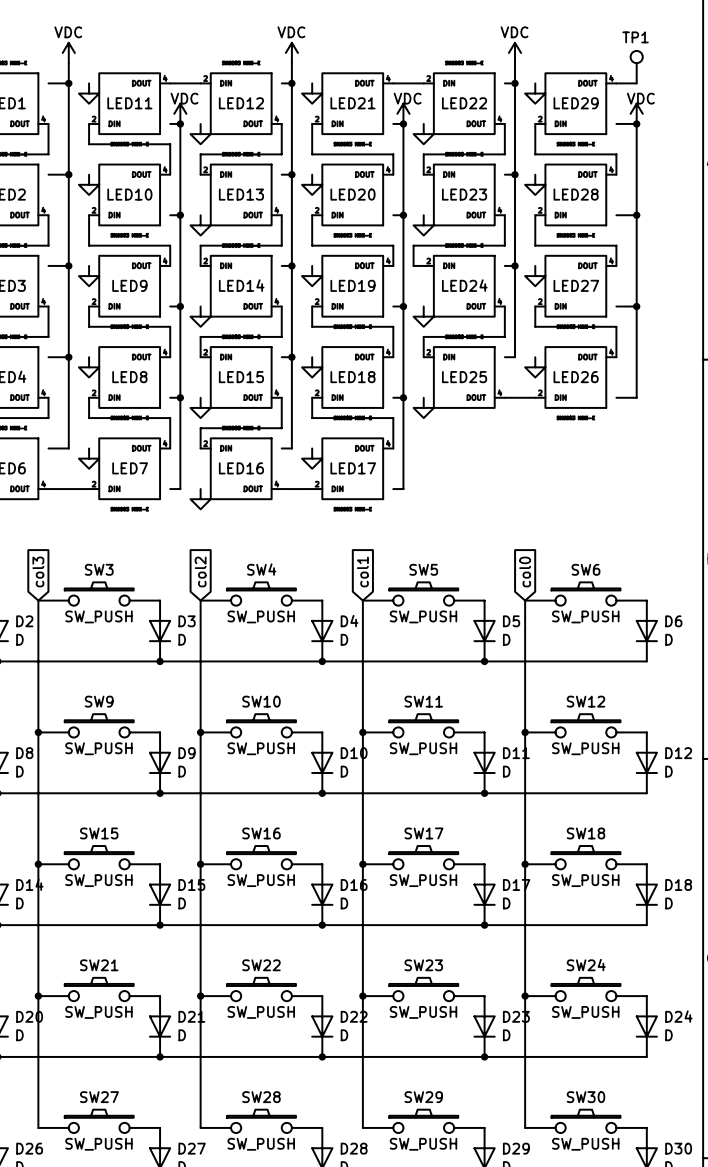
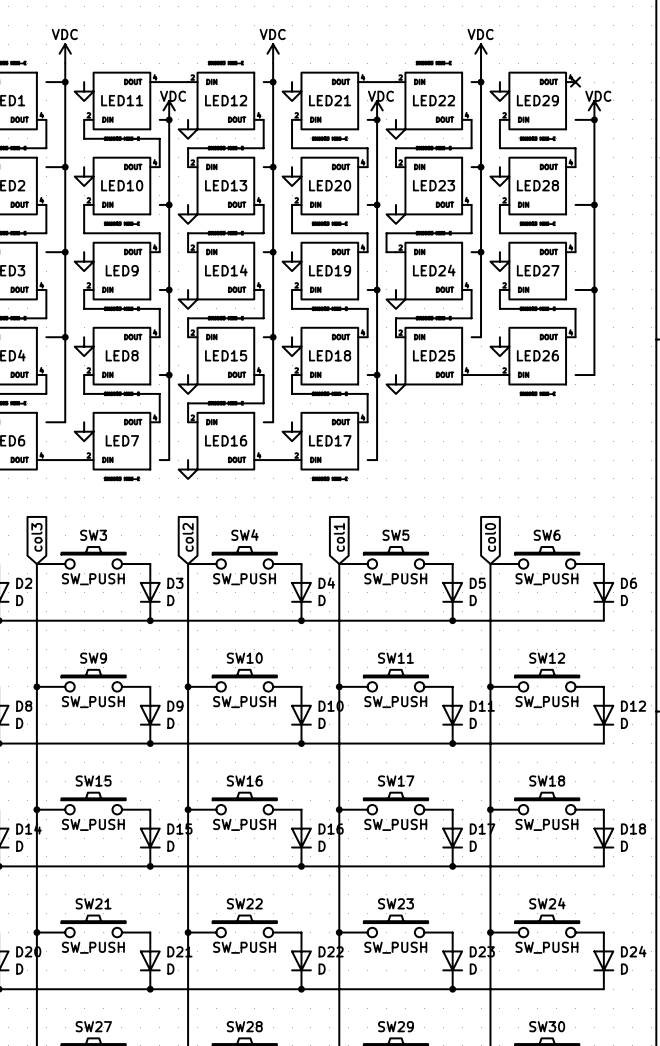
TP1: (636, 67) -> none
wire: (616, 83) (636, 83) -> none
no-connect mark: none -> (575, 82)

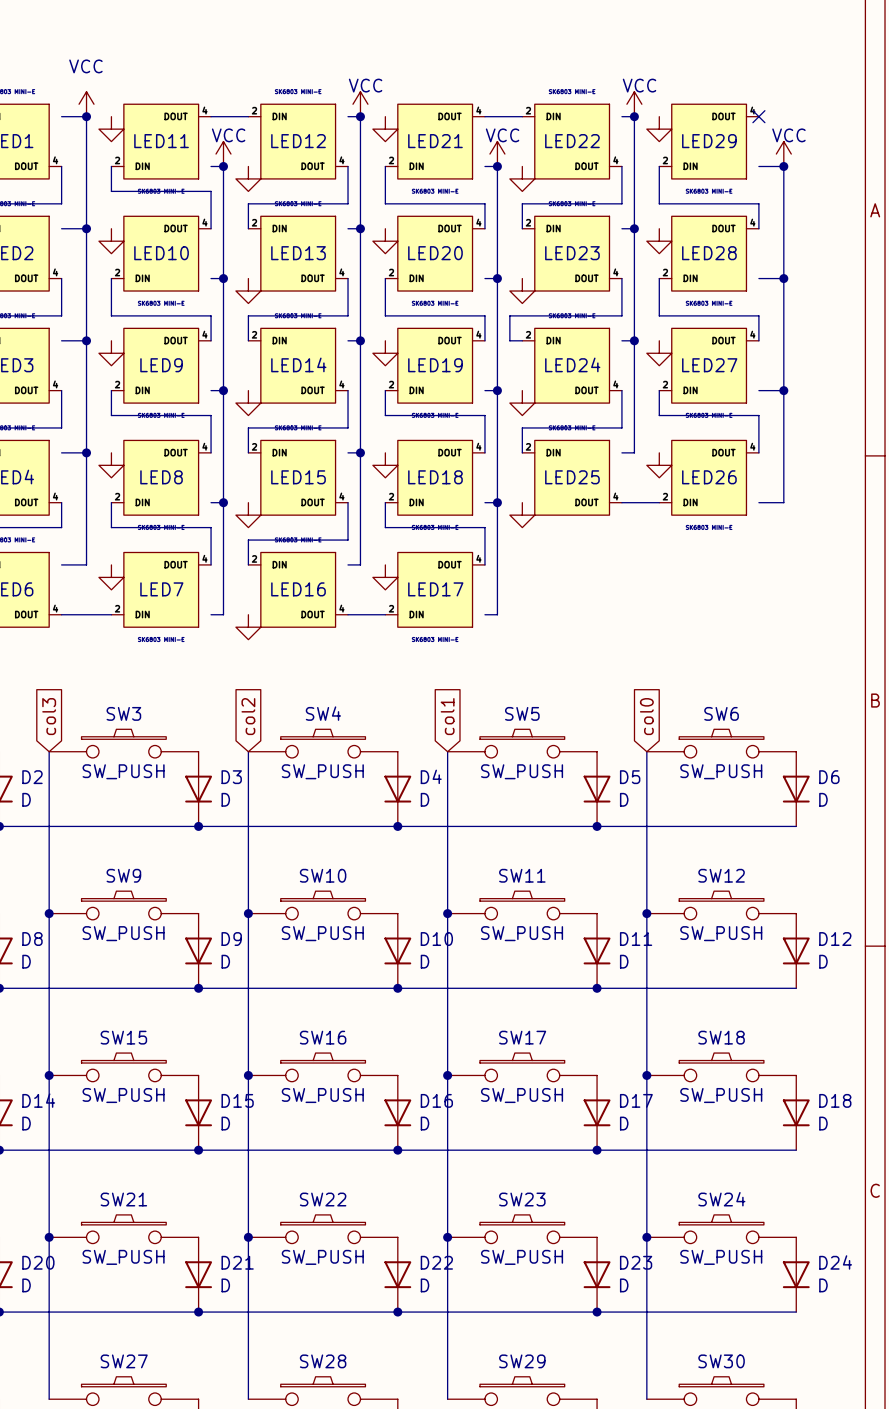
power symbol: VDC (65, 53) -> none
power symbol: VDC (273, 53) -> none
power symbol: VDC (481, 53) -> none
power symbol: none -> VCC (86, 104)
power symbol: none -> VCC (360, 104)
power symbol: none -> VCC (634, 104)
power symbol: VDC (169, 110) -> VCC (223, 154)
power symbol: VDC (377, 110) -> VCC (497, 154)
power symbol: VDC (594, 110) -> VCC (783, 154)

